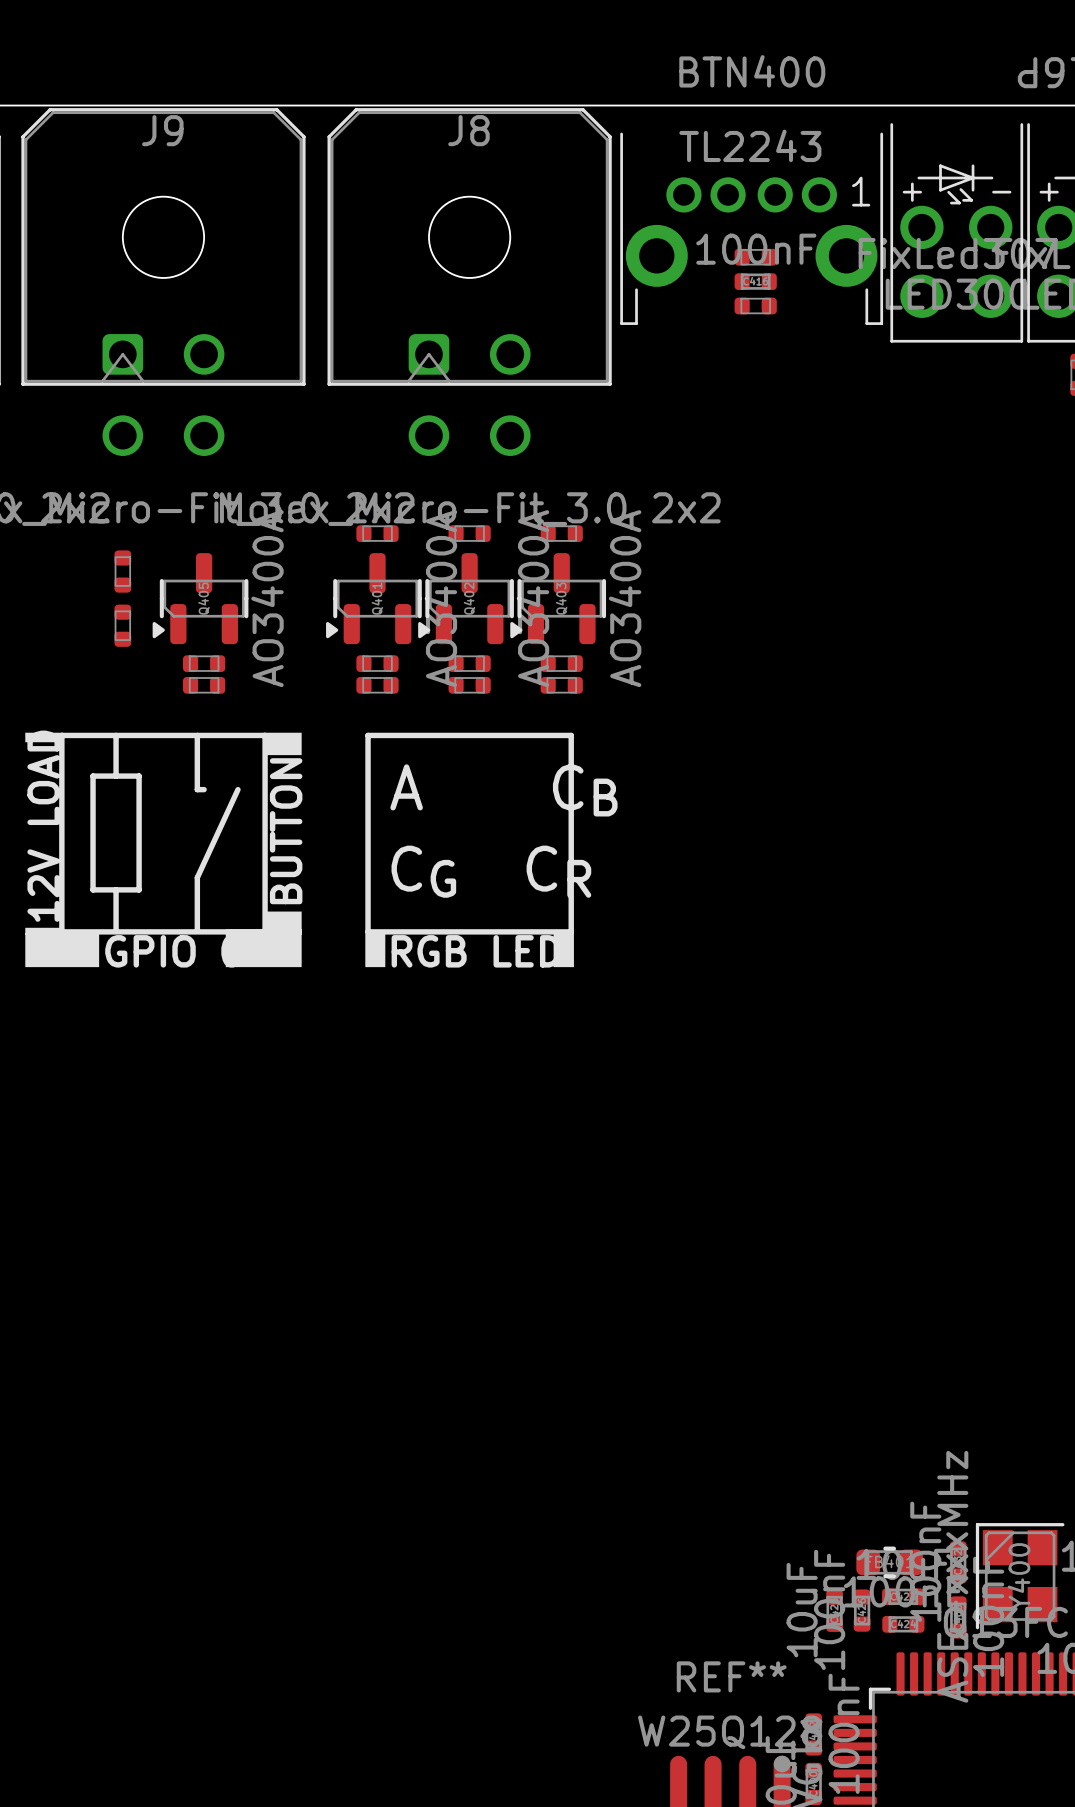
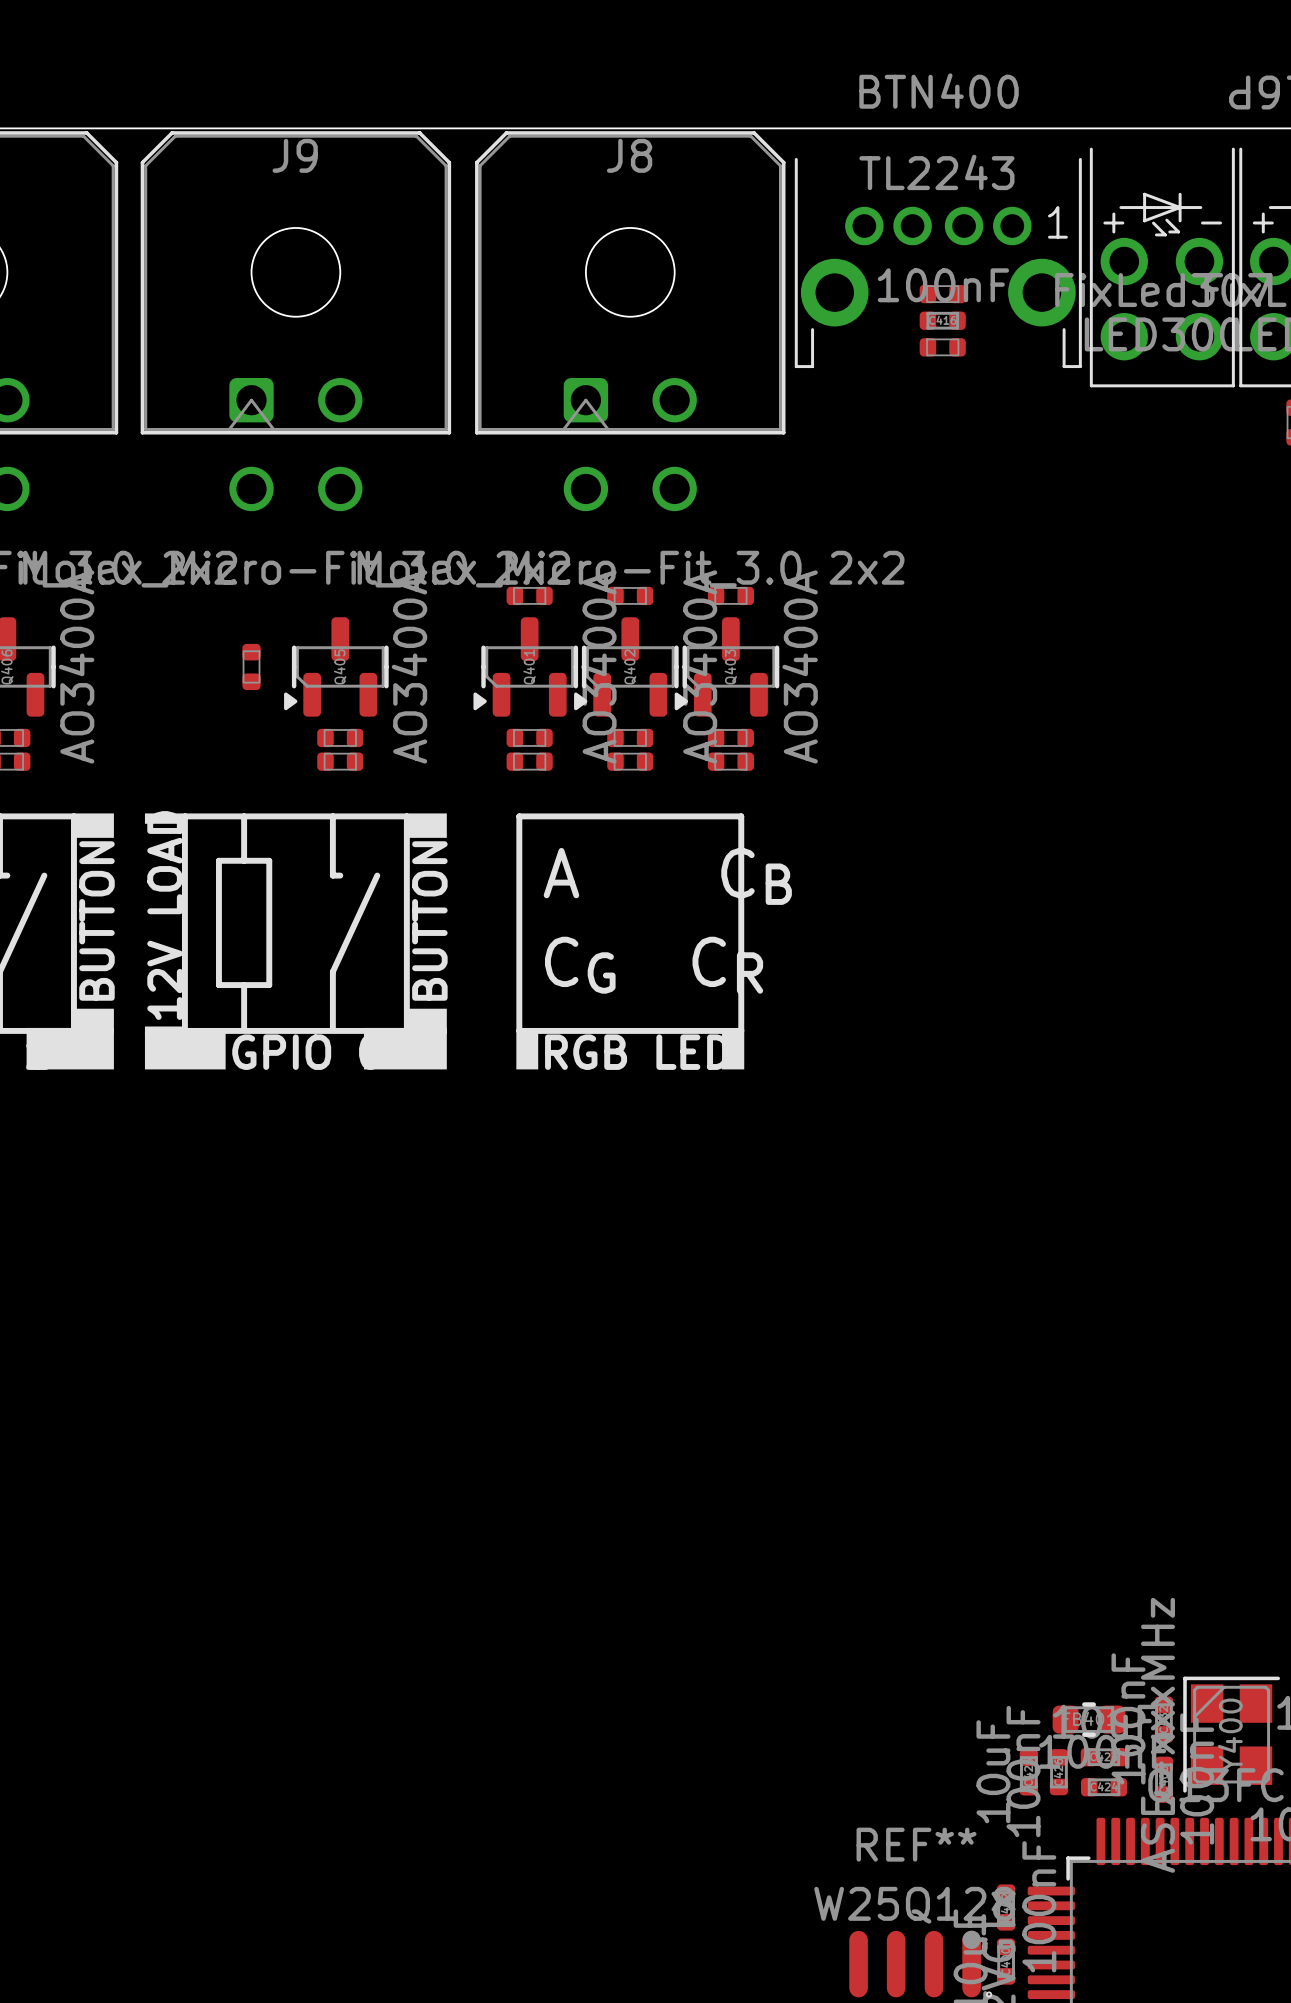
part: (122, 571) -> none
part: none -> (251, 666)
part: (122, 625) -> none

